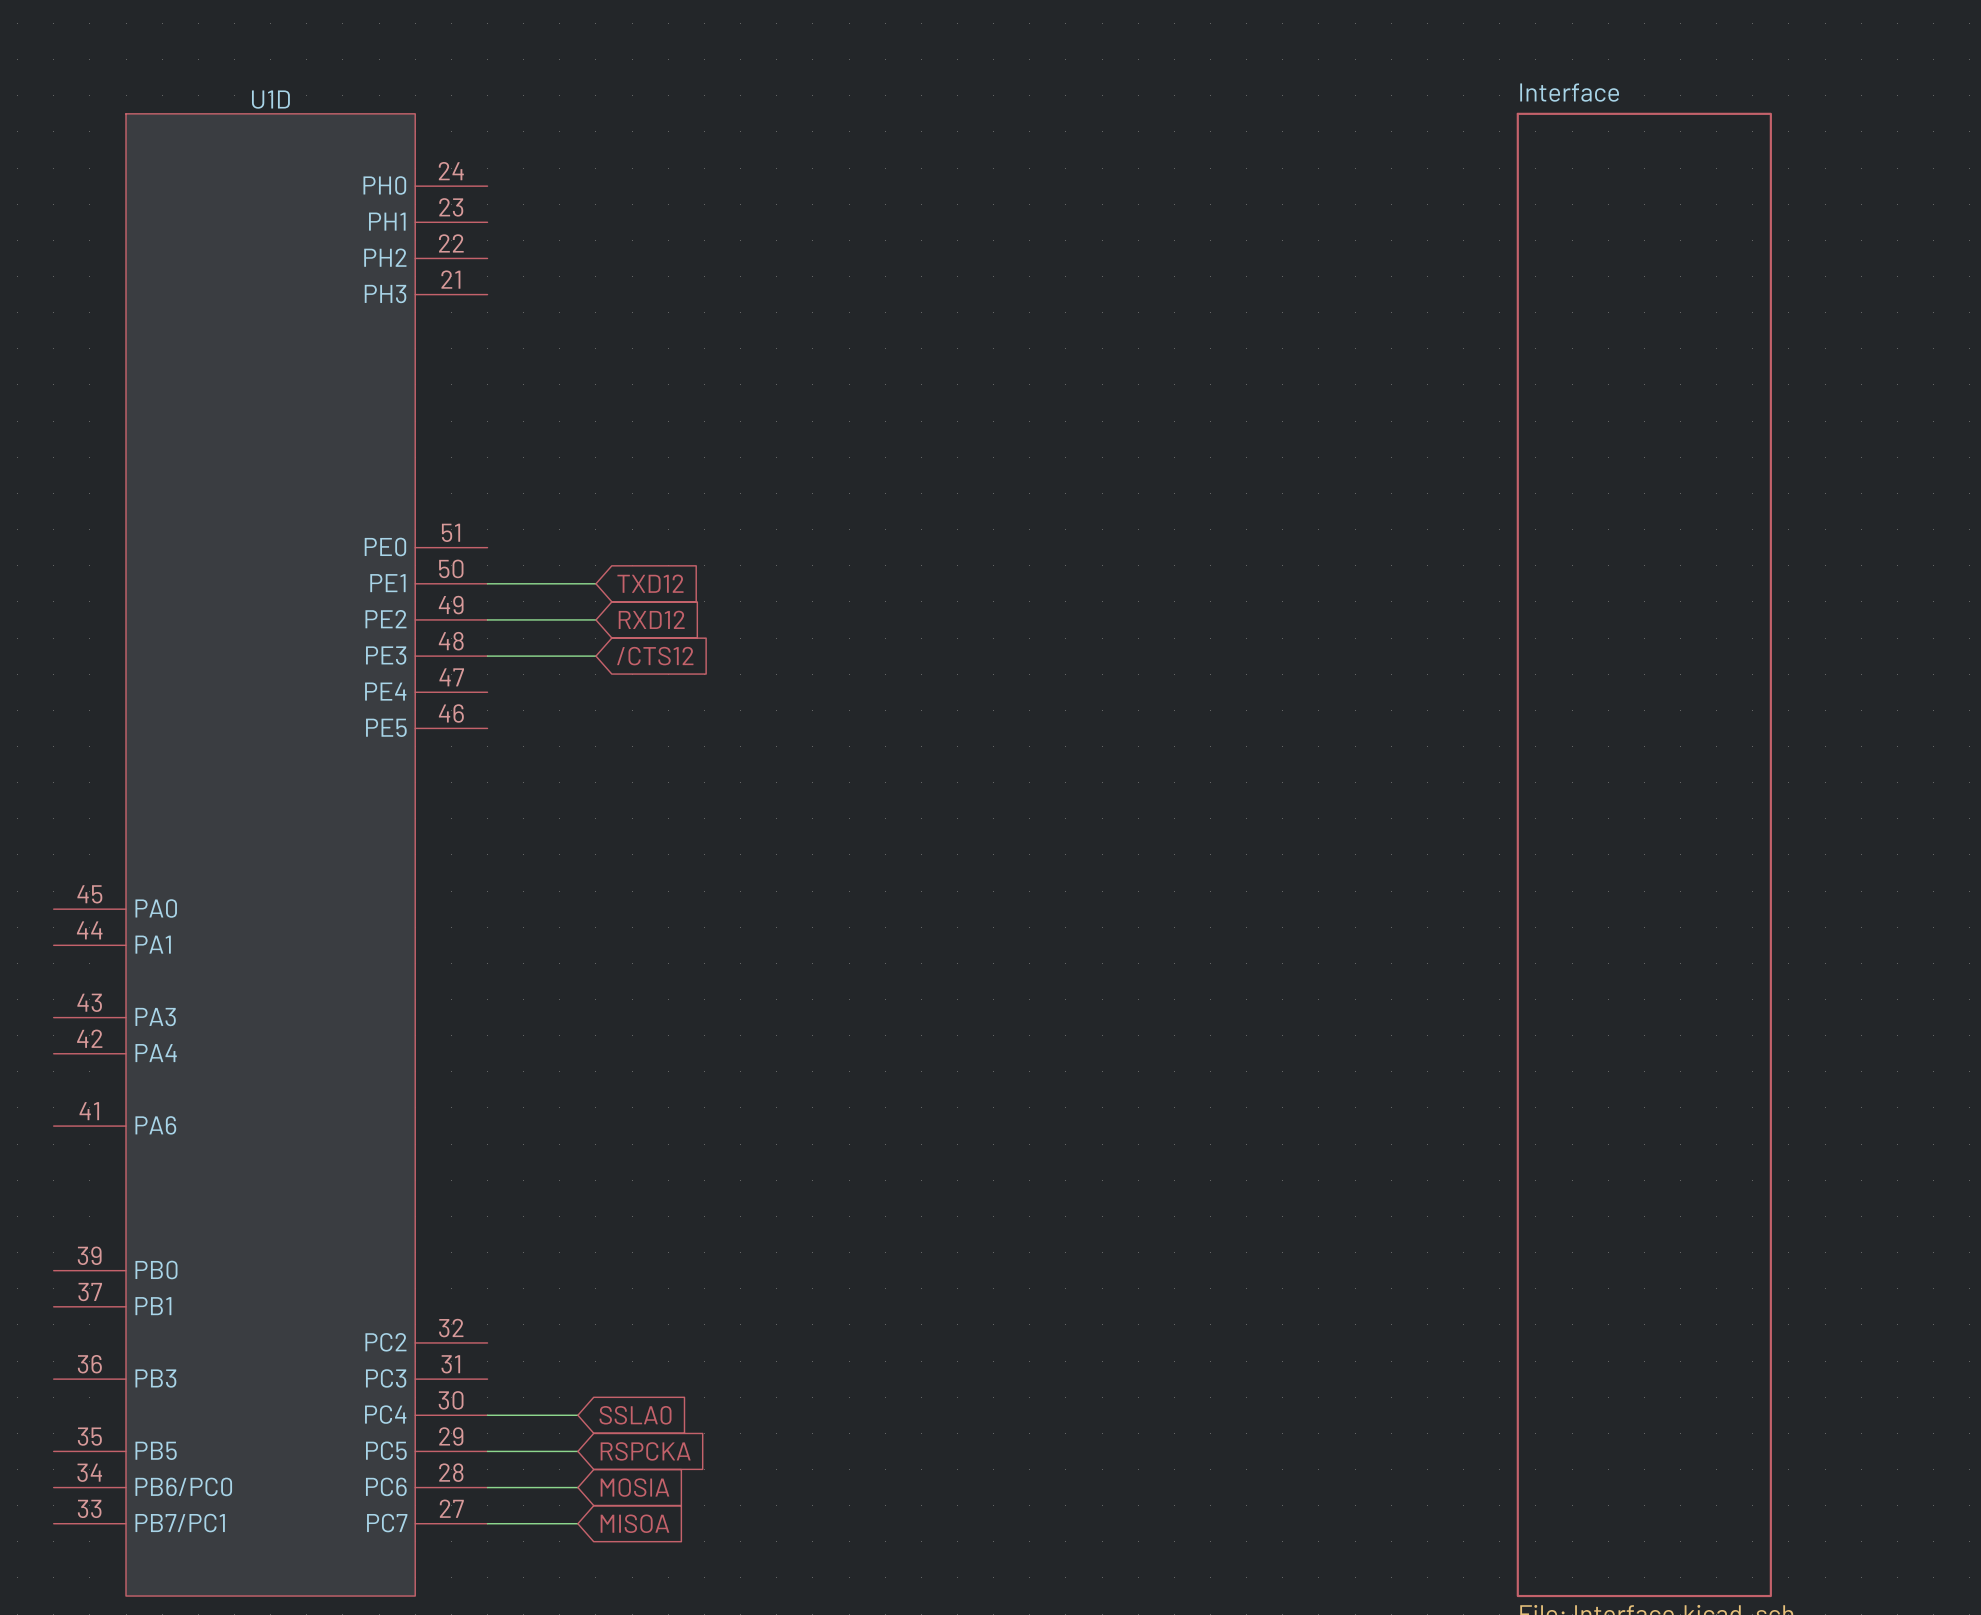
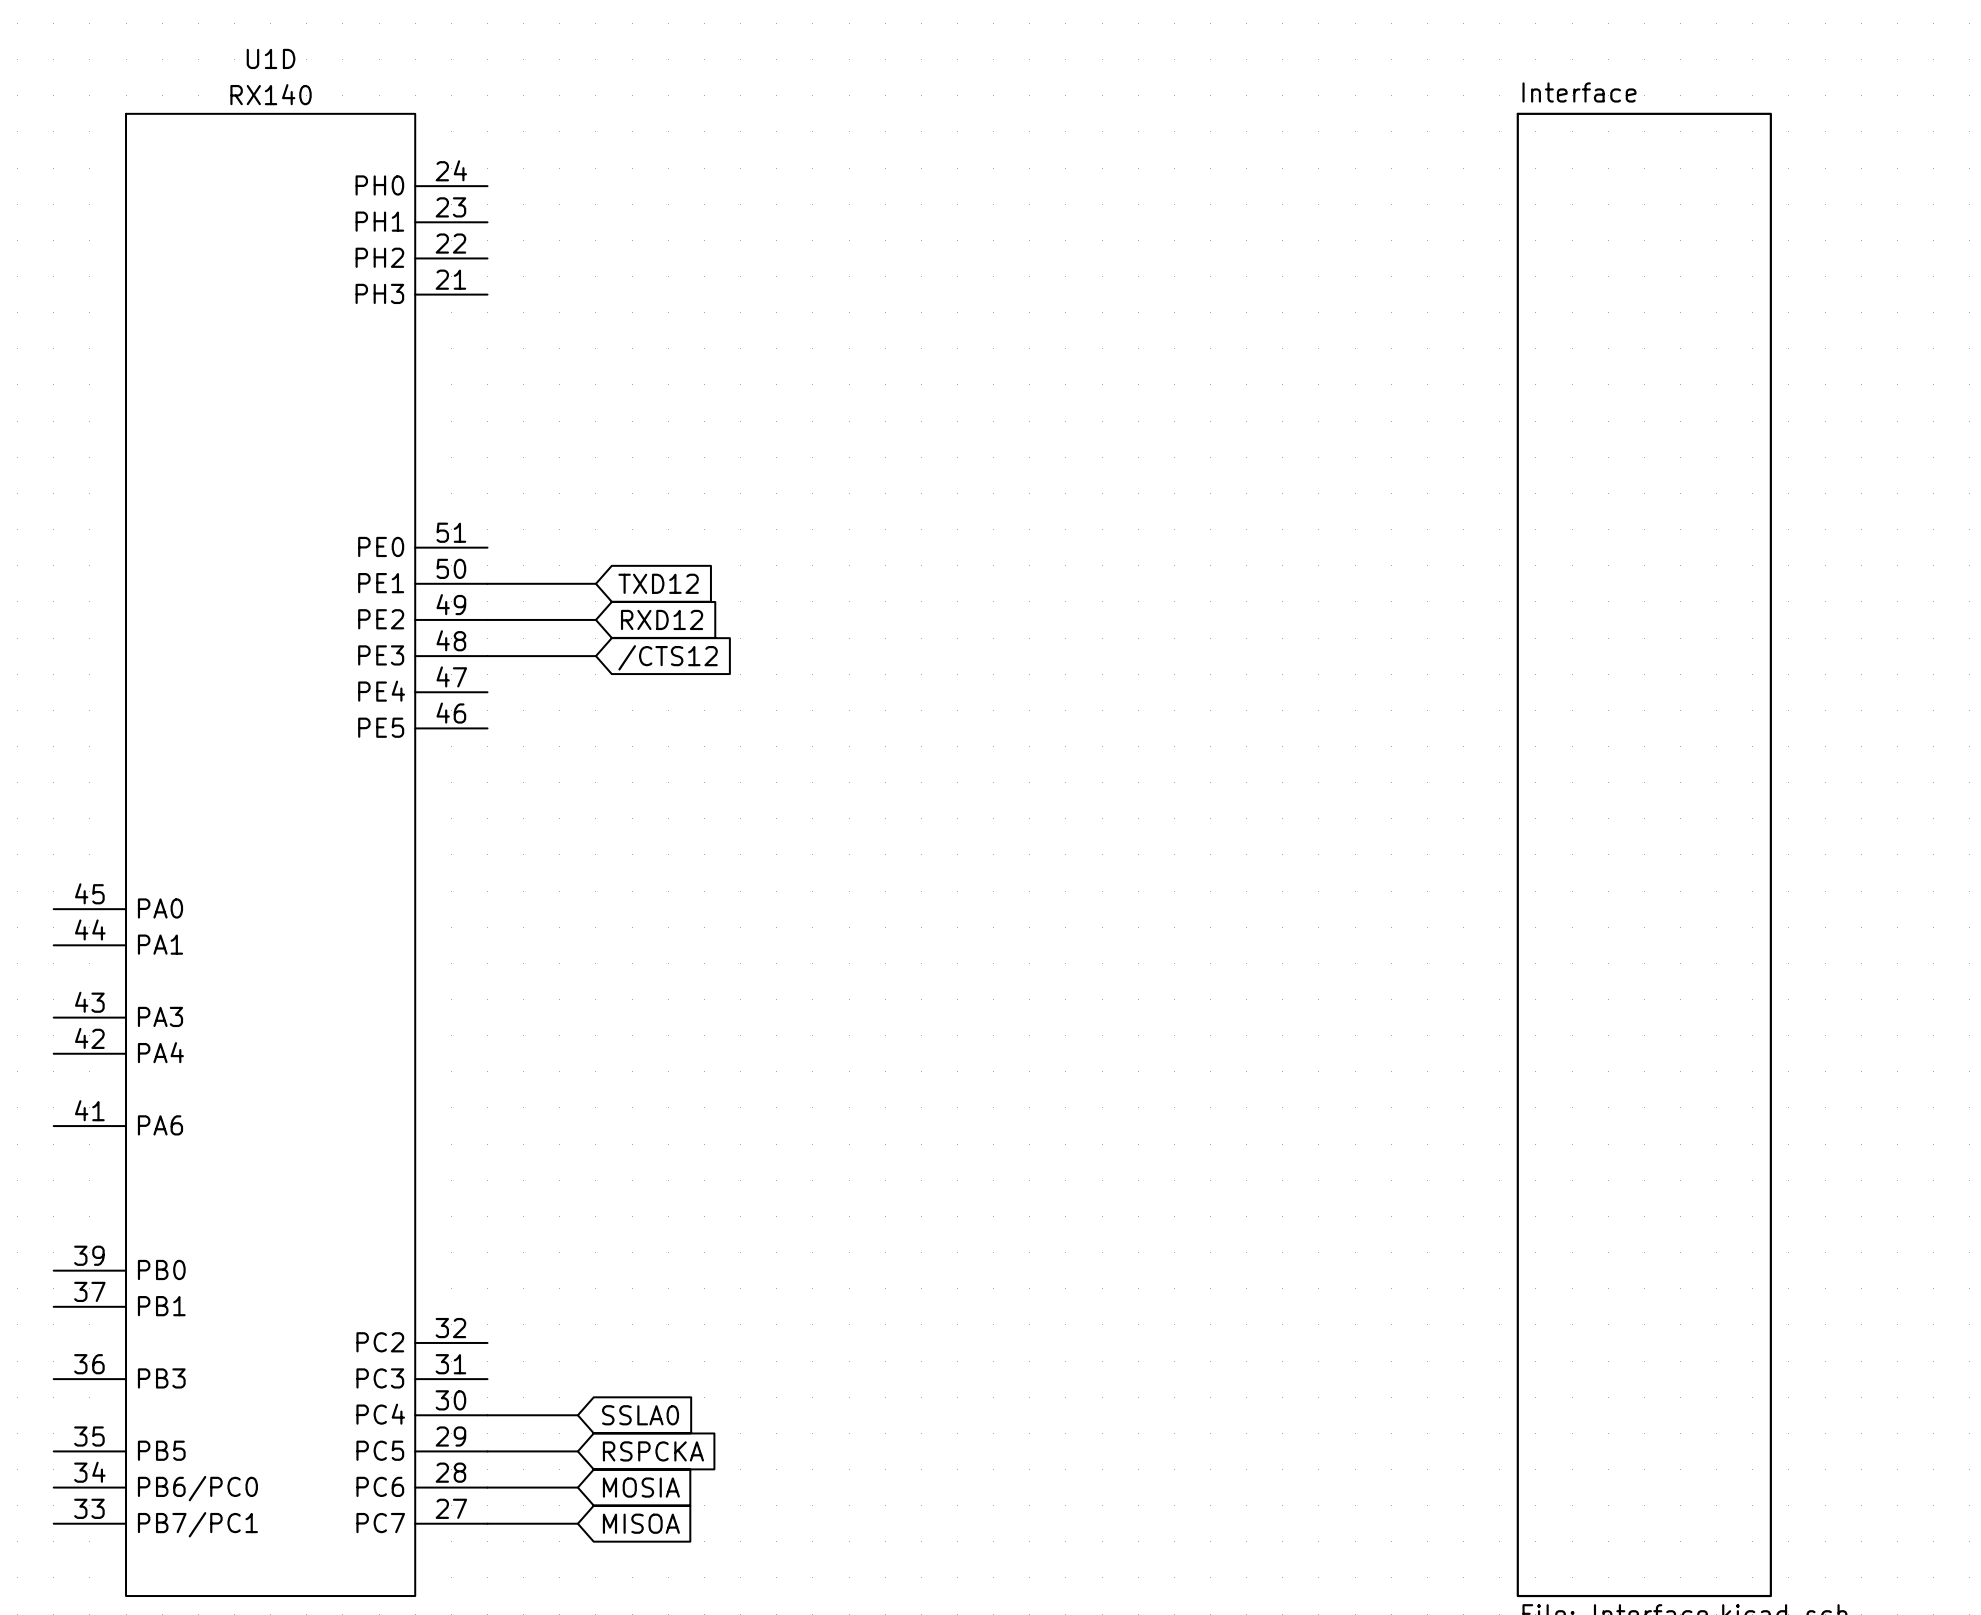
U1D value: none -> RX140 (271, 94)
U1D name position: U1D (270, 99) -> U1D (271, 58)

